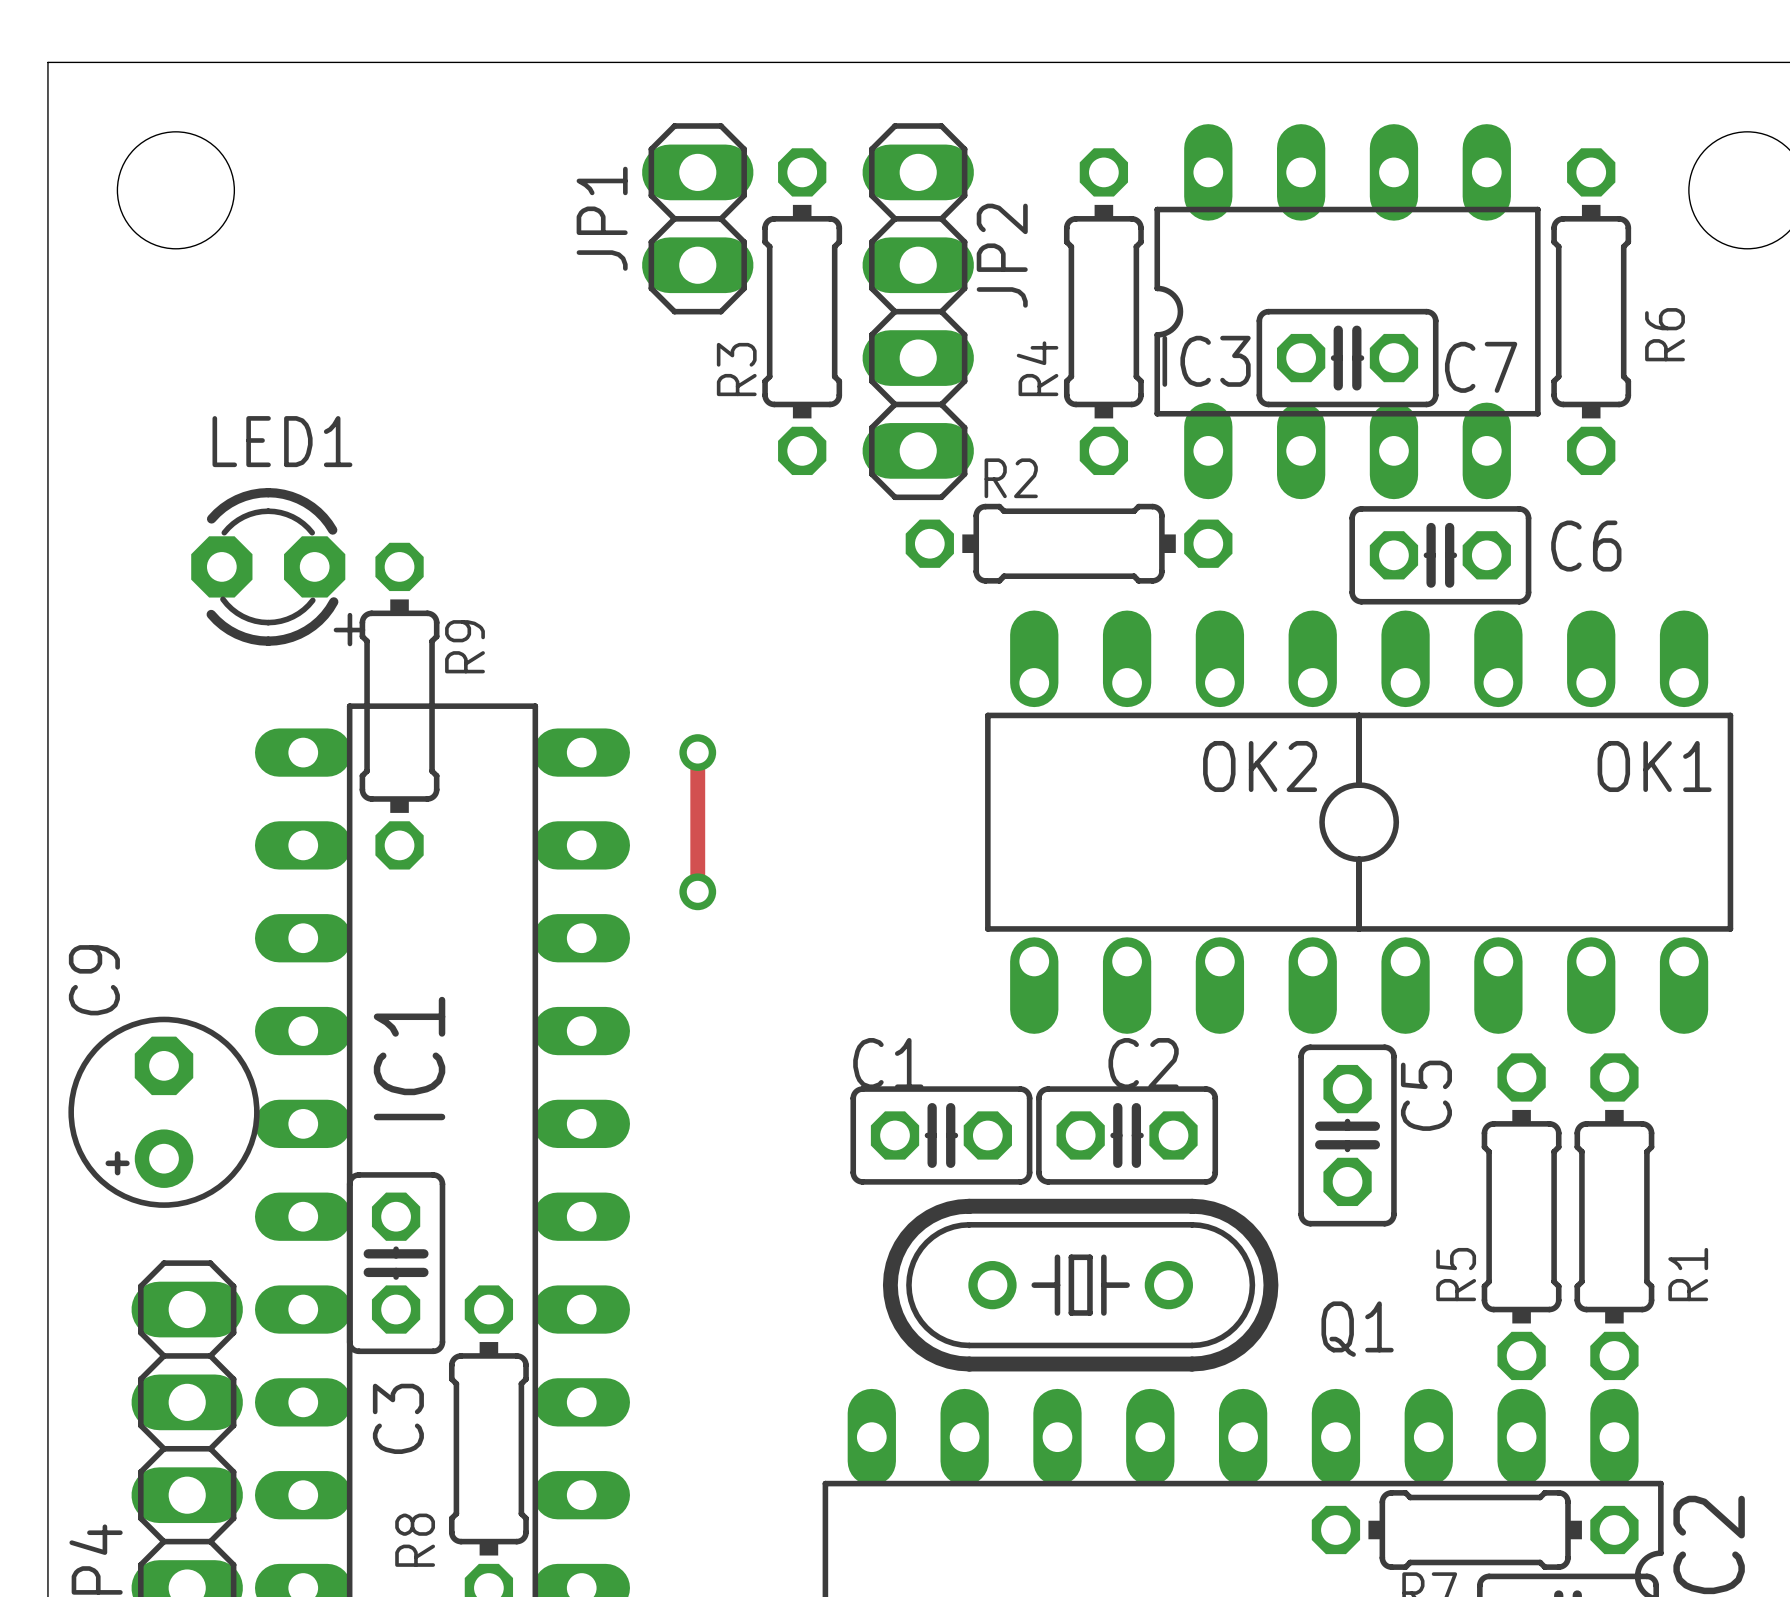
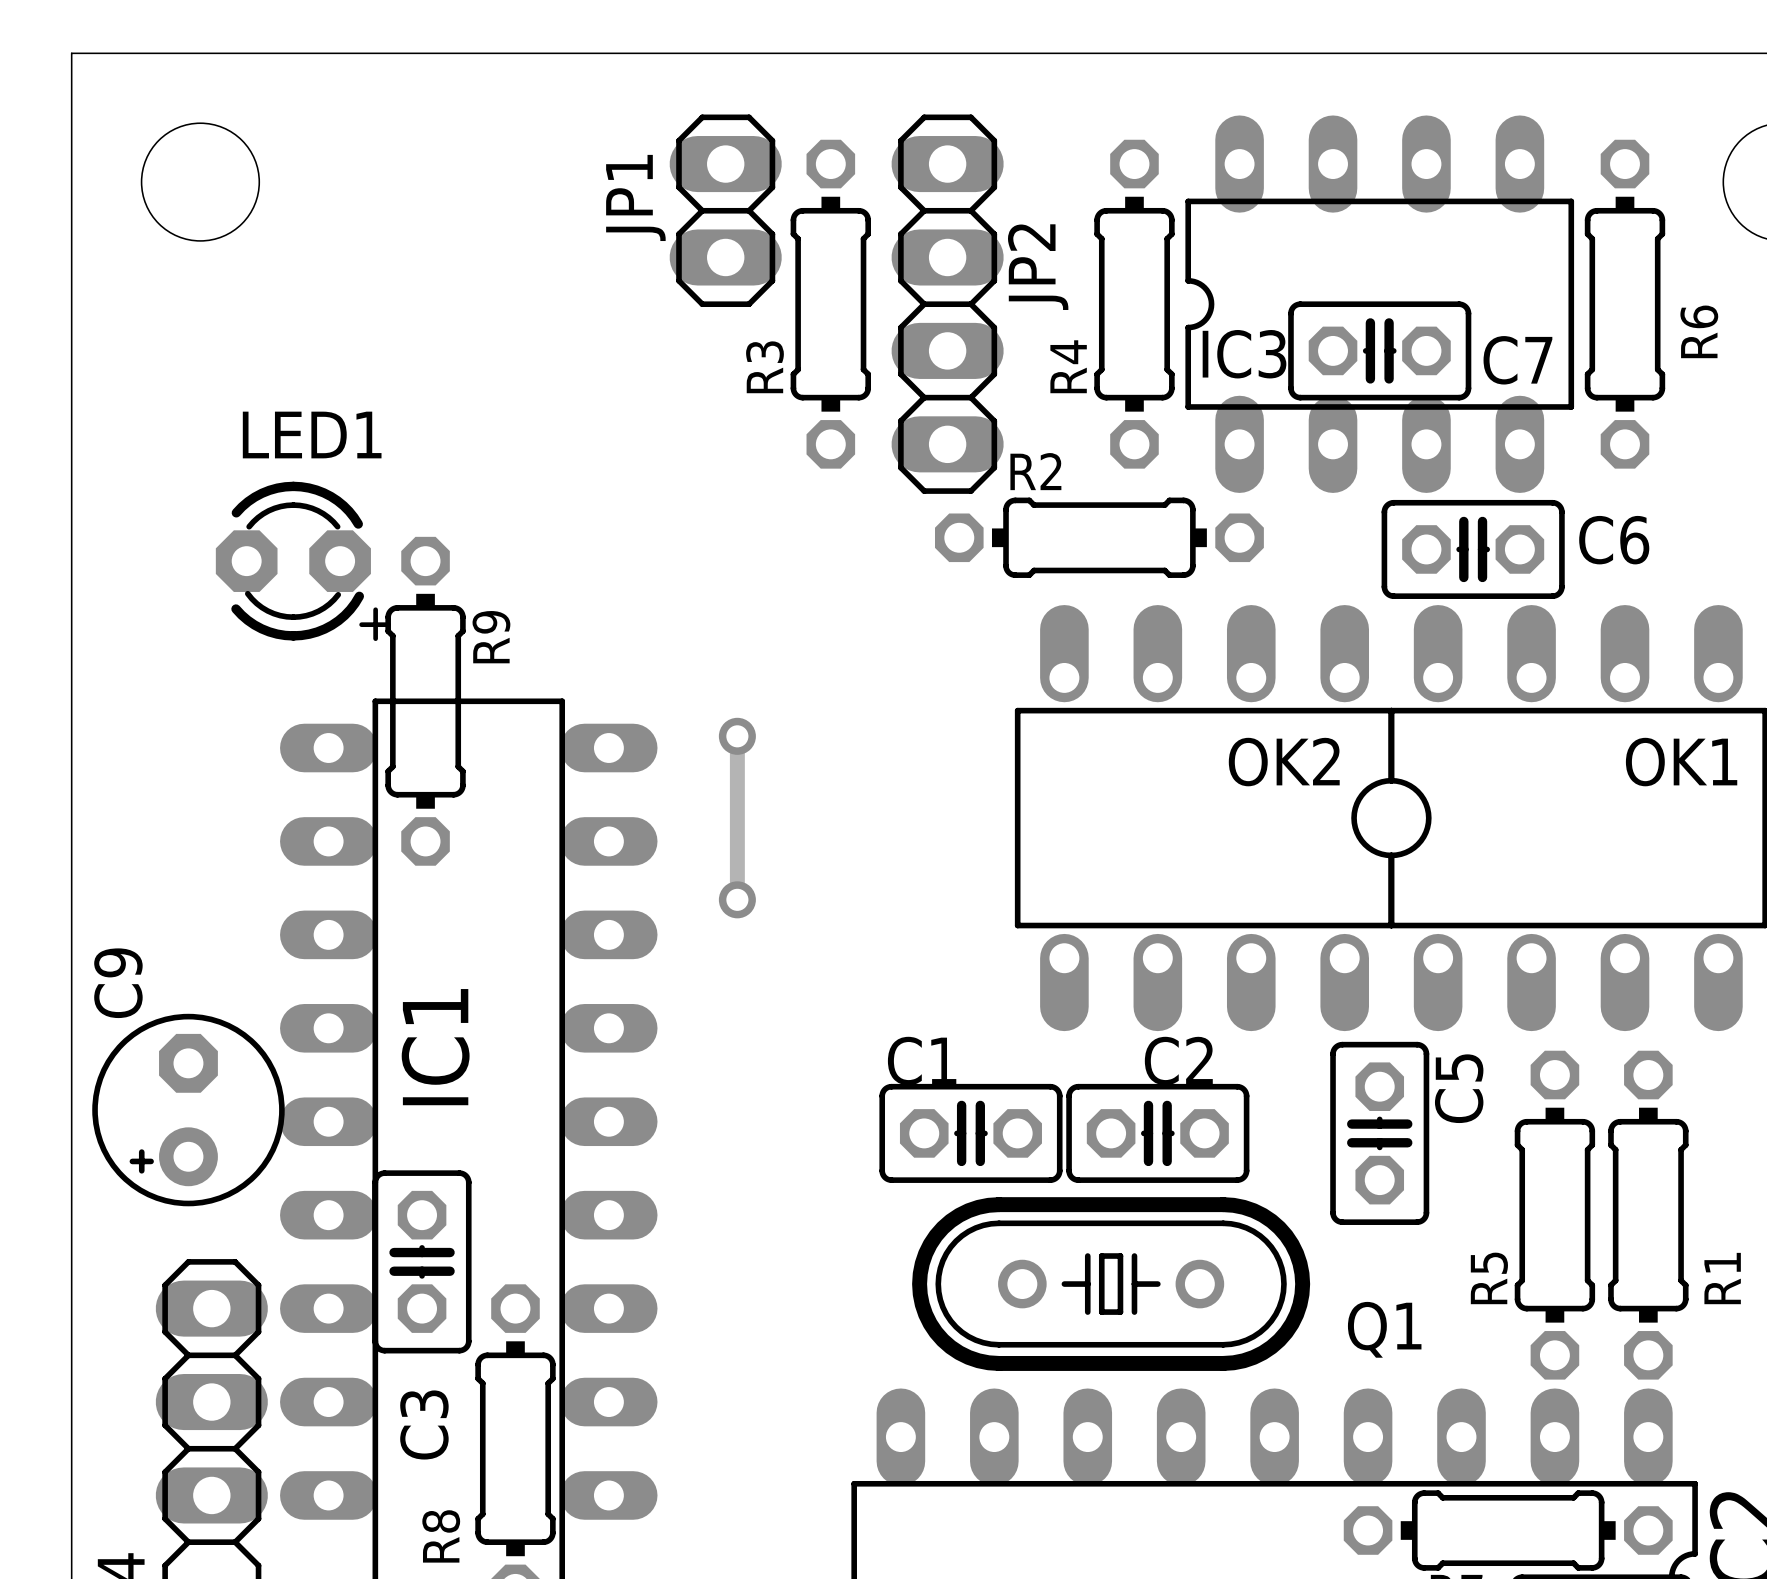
track: none -> (737, 736) (737, 899)
track: (697, 752) (697, 891) -> none
via position: (697, 752) -> (737, 736)
via position: (697, 891) -> (737, 899)

